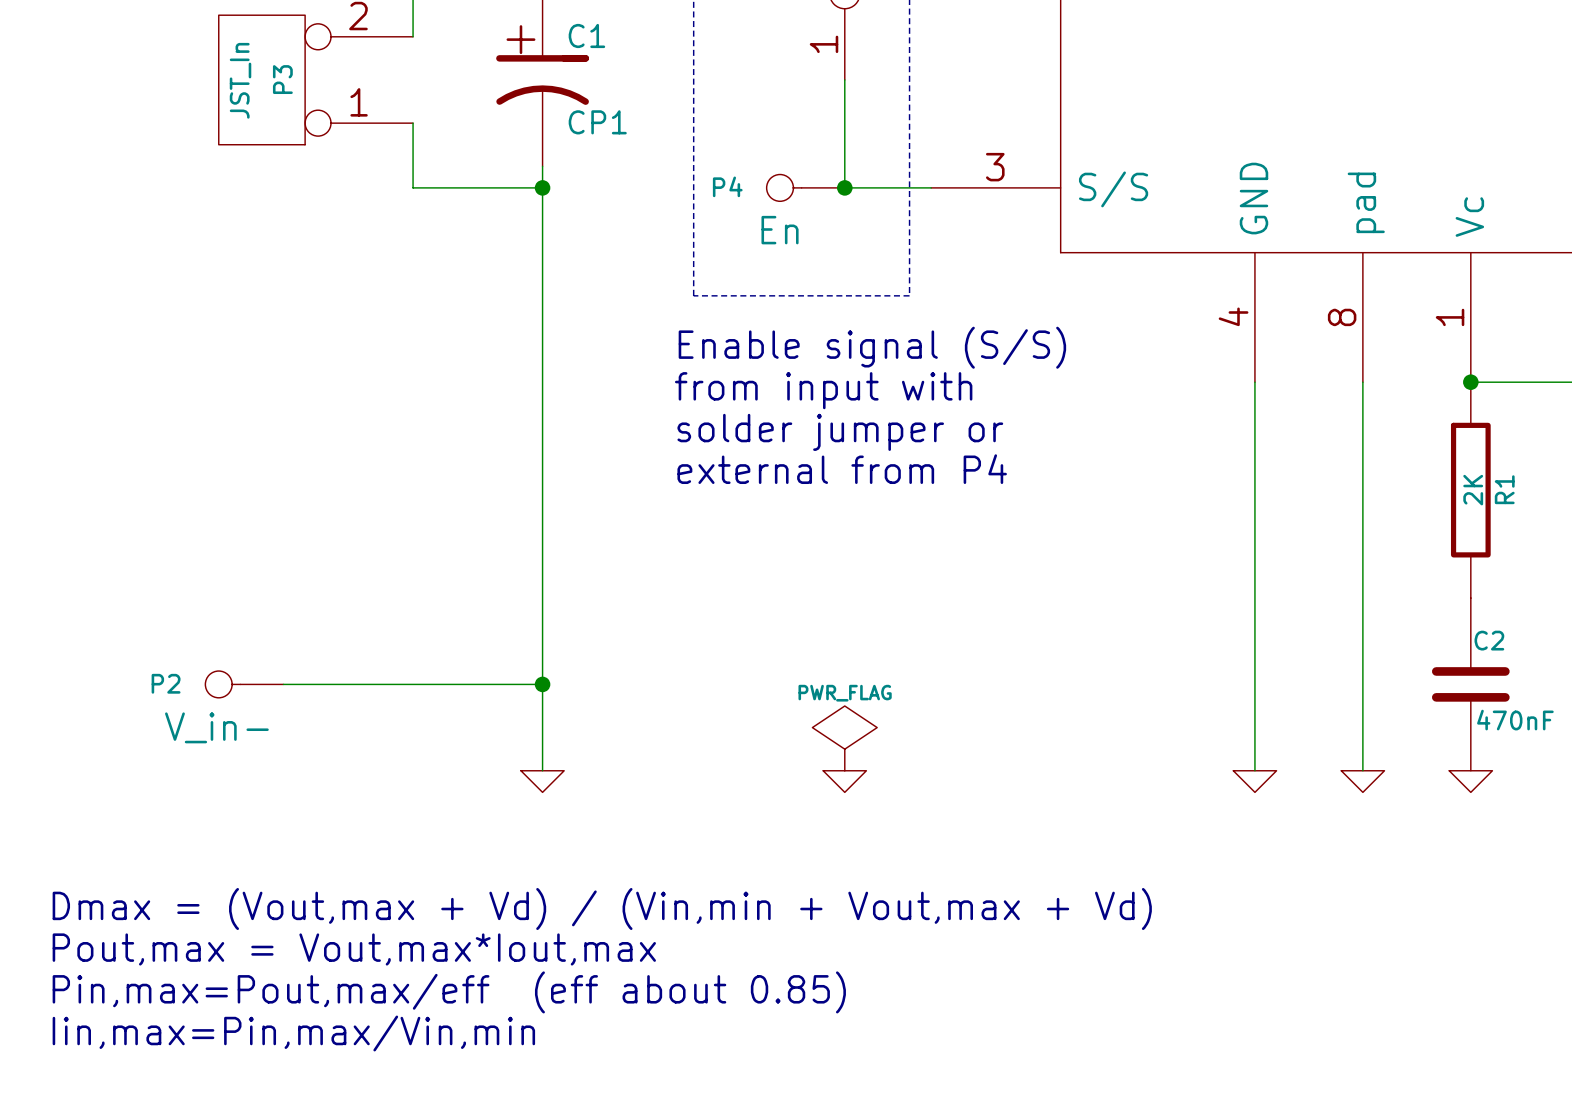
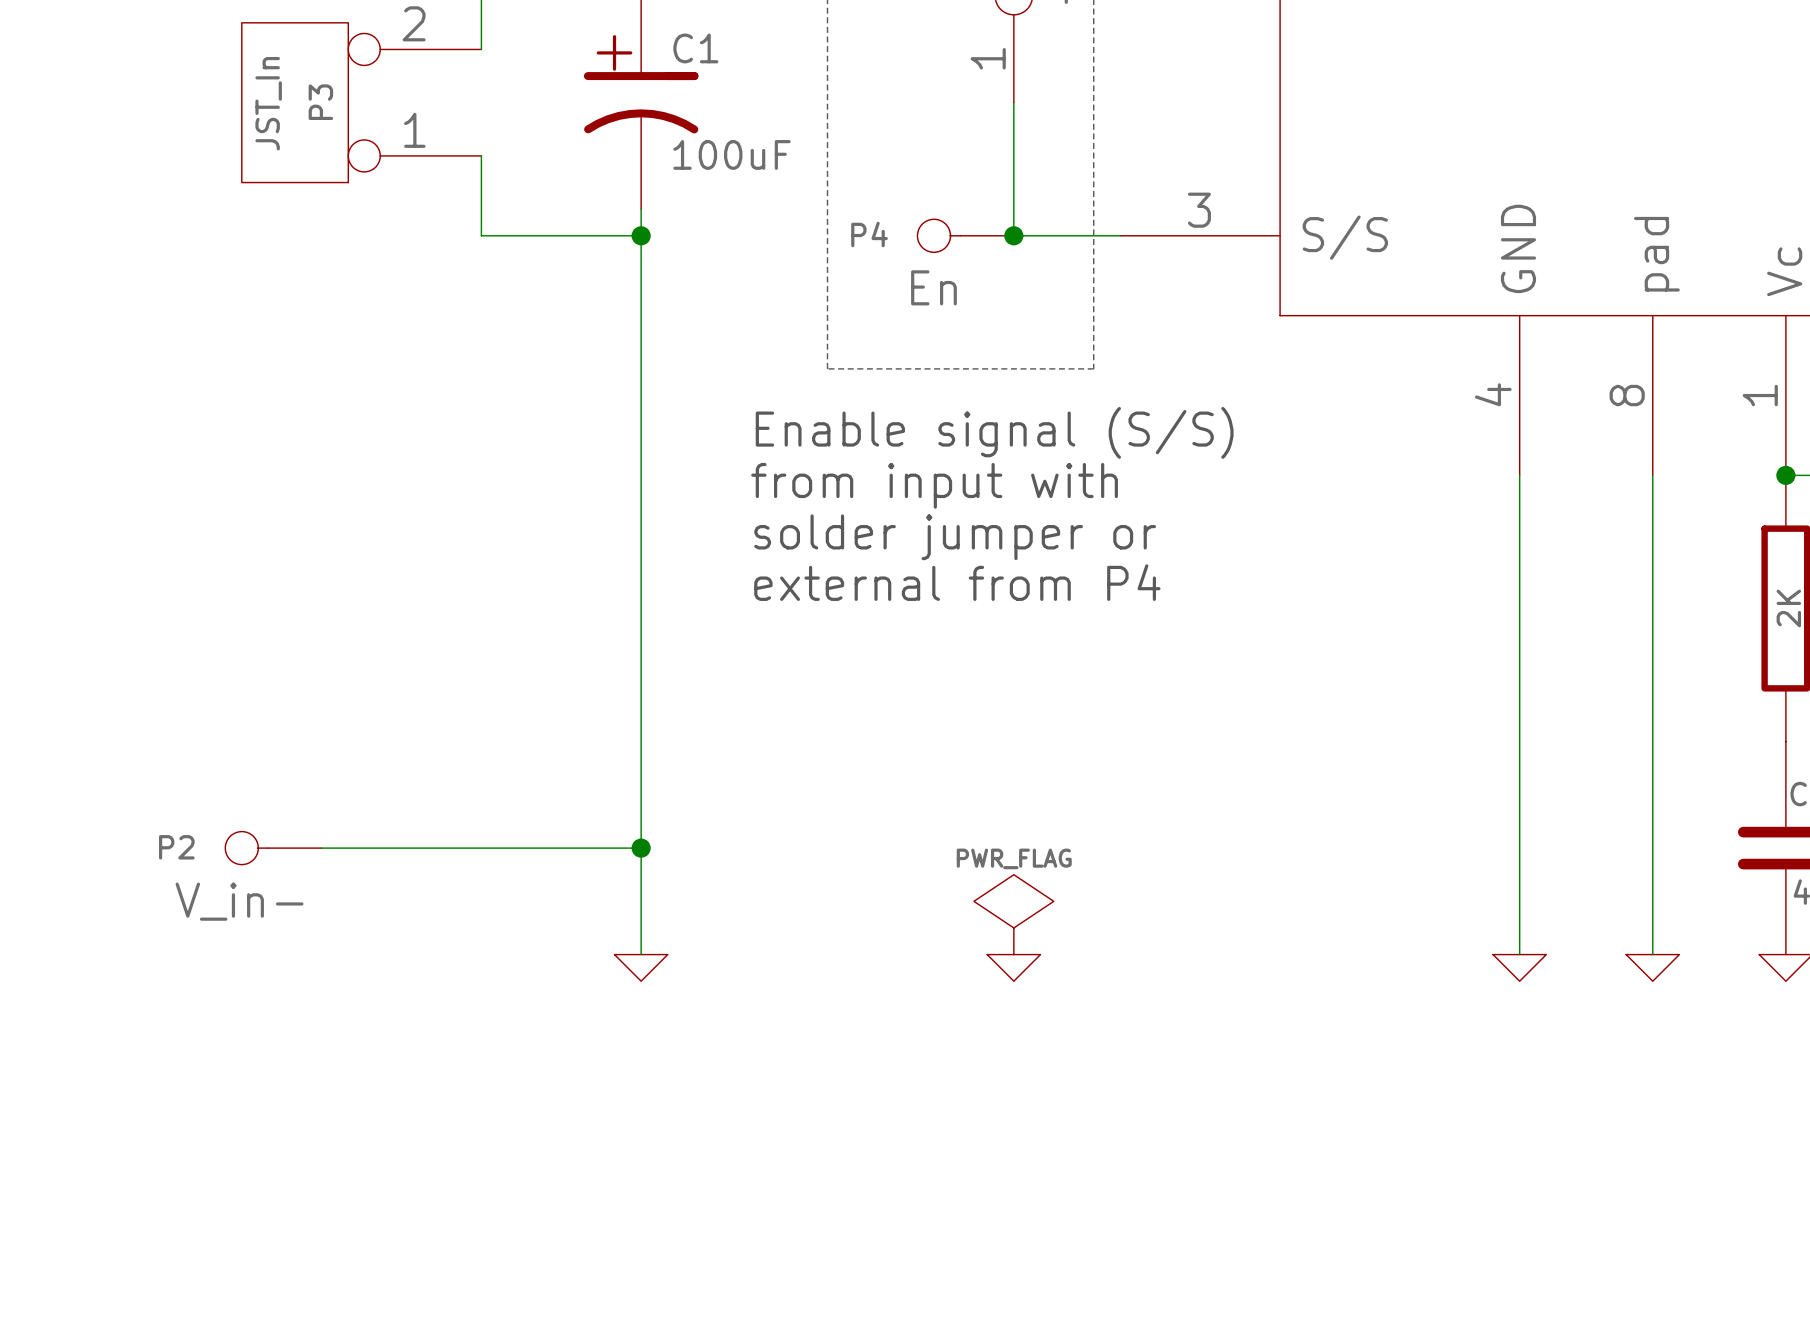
C1 value: CP1 (597, 122) -> 100uF (731, 154)
text position: Enable signal (S/S) (872, 347) -> Enable signal (S/S) (994, 432)
text position: from input with (823, 390) -> from input with (934, 485)
text position: solder jumper or (840, 432) -> solder jumper or (955, 537)
text position: external from P4 (842, 469) -> external from P4 (957, 582)
text: Dmax = (Vout,max + Vd) / (Vin,min + Vout,max + Vd) (602, 908) -> none
text: Pout,max = Vout,max*Iout,max (354, 949) -> none
text: Pin,max=Pout,max/eff (eff about 0.85) (449, 992) -> none
text: Iin,max=Pin,max/Vin,min (293, 1033) -> none

